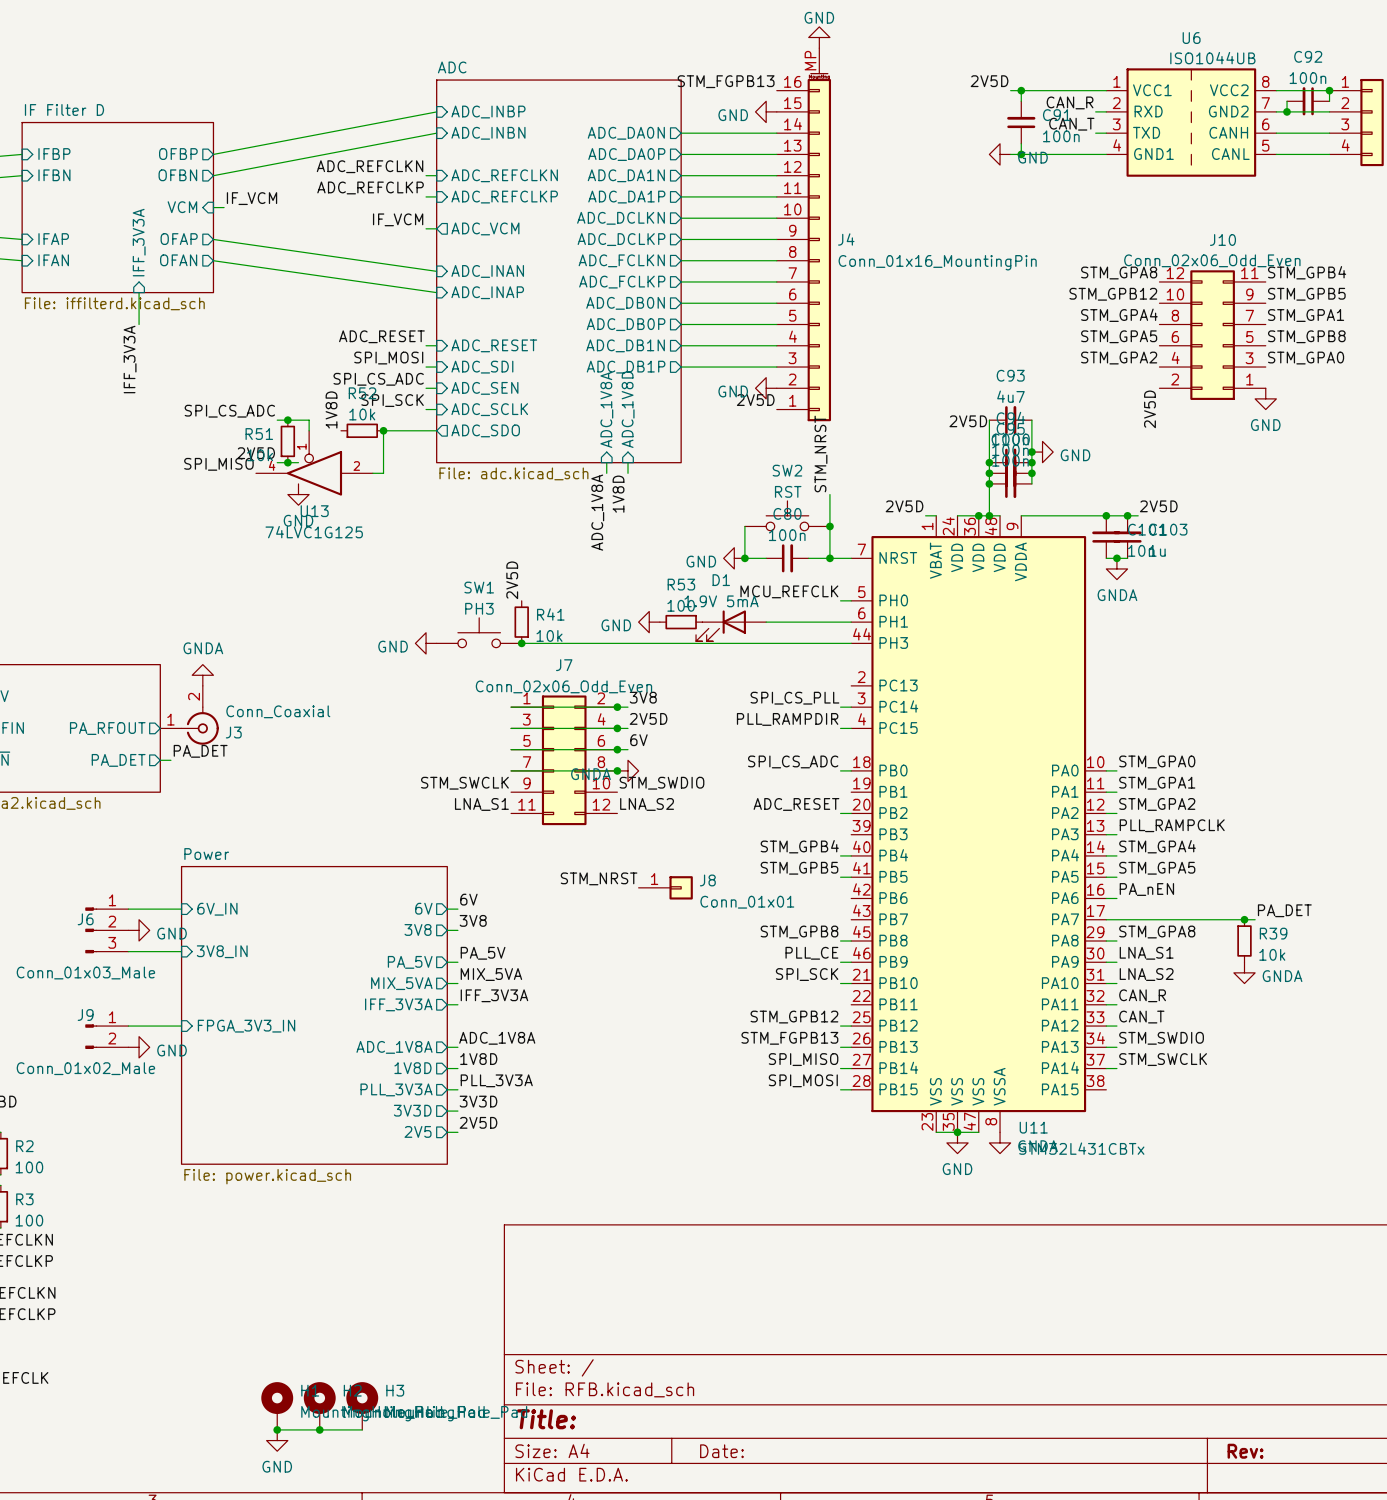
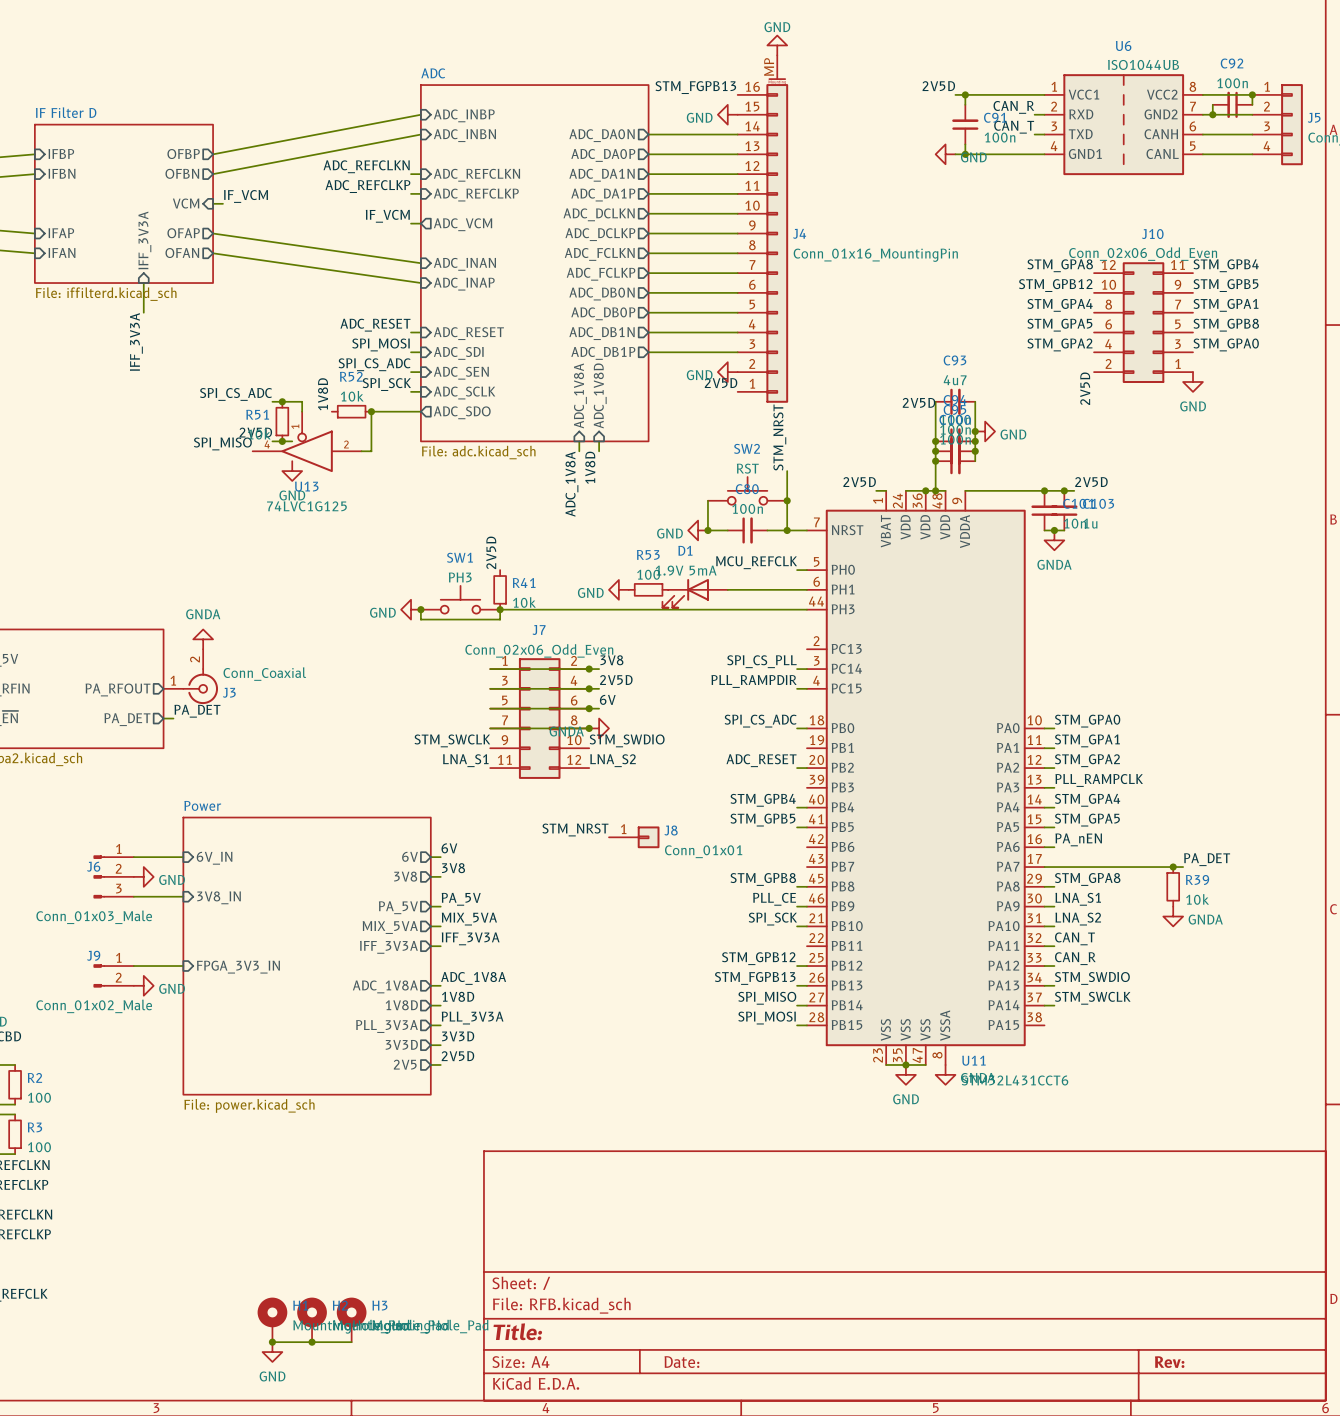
wire: none -> (420, 609) (420, 619) (500, 619) (500, 609)
junction: none -> (420, 609)
label: CAN_R (1142, 995) -> CAN_T (1074, 938)
label: CAN_T (1141, 1017) -> CAN_R (1075, 958)
U11 value: STM32L431CBTx (1081, 1148) -> STM32L431CCT6 (1015, 1080)

